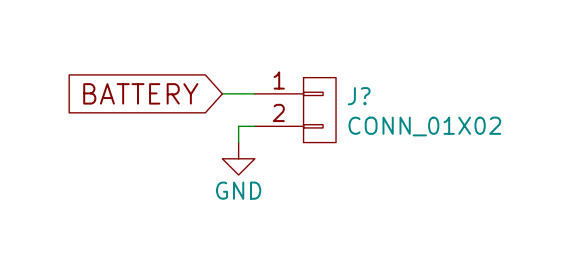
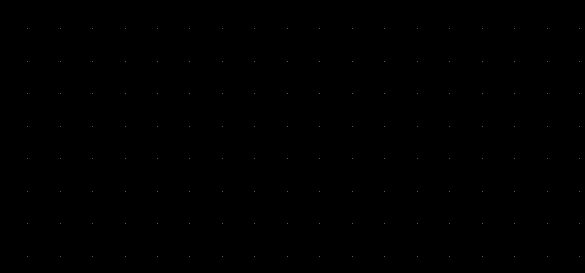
global label: BATTERY (140, 93) -> none
wire: (222, 93) (254, 93) -> none
J?: CONN_01X02 (295, 110) -> none
wire: (254, 126) (238, 126) (238, 142) -> none
power symbol: GND (238, 158) -> none

